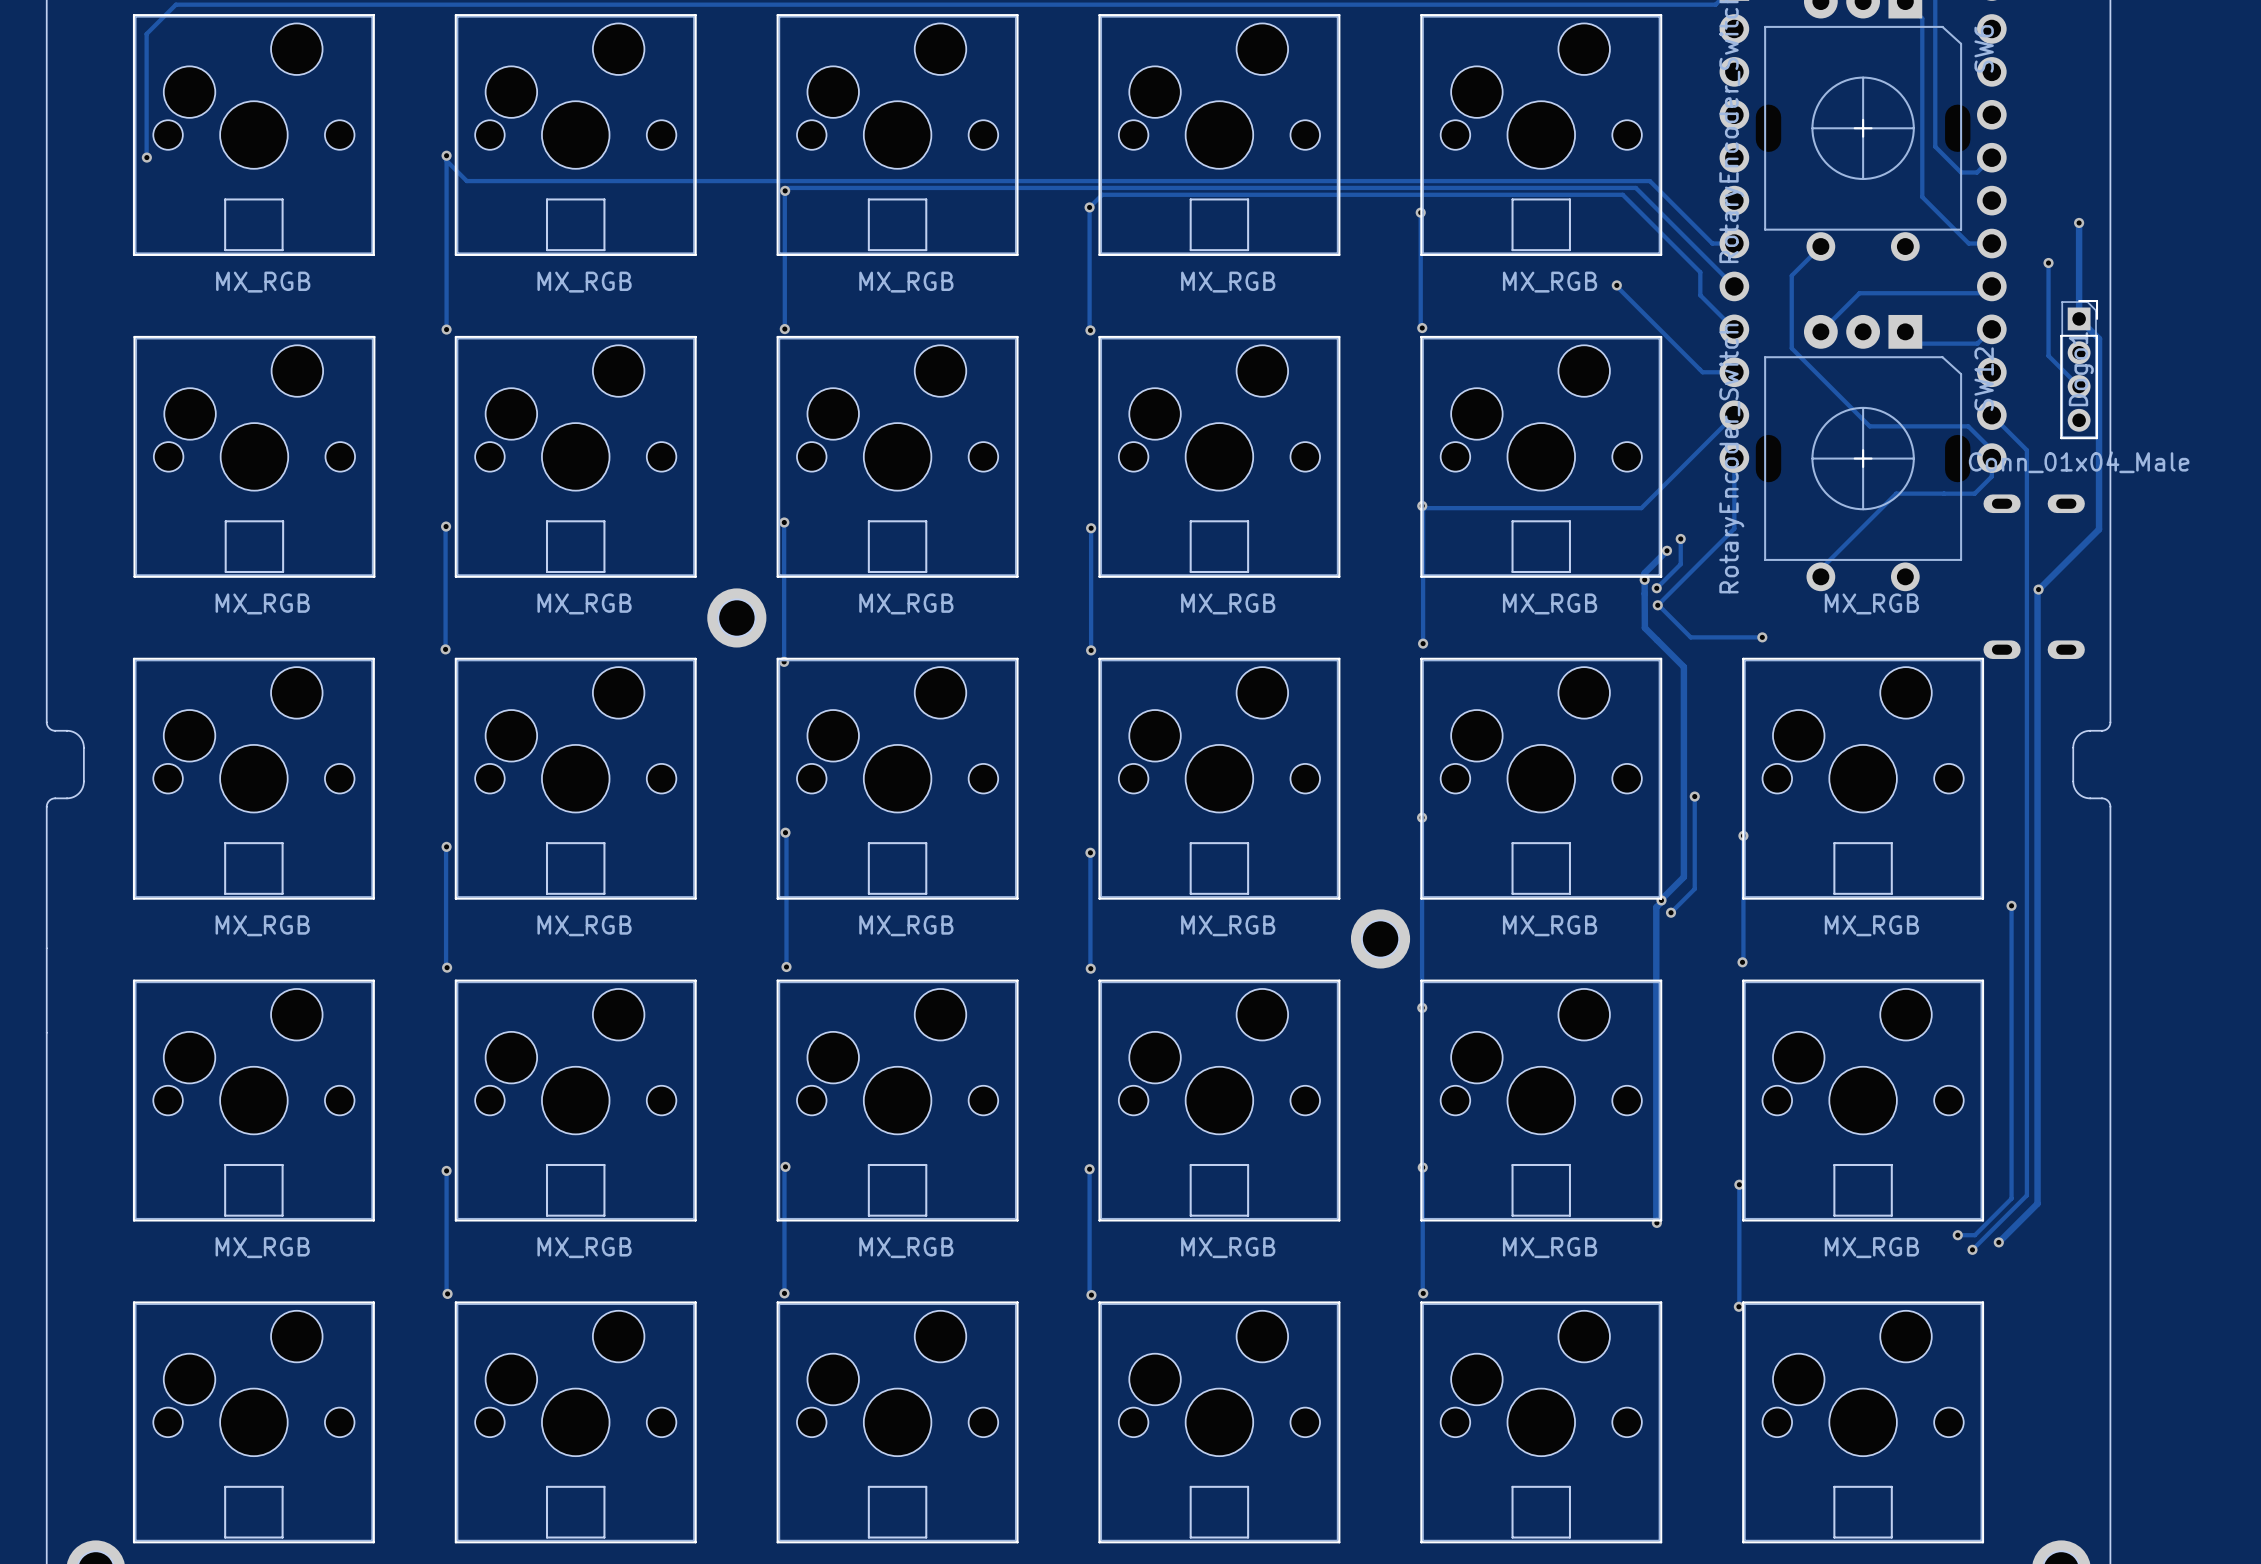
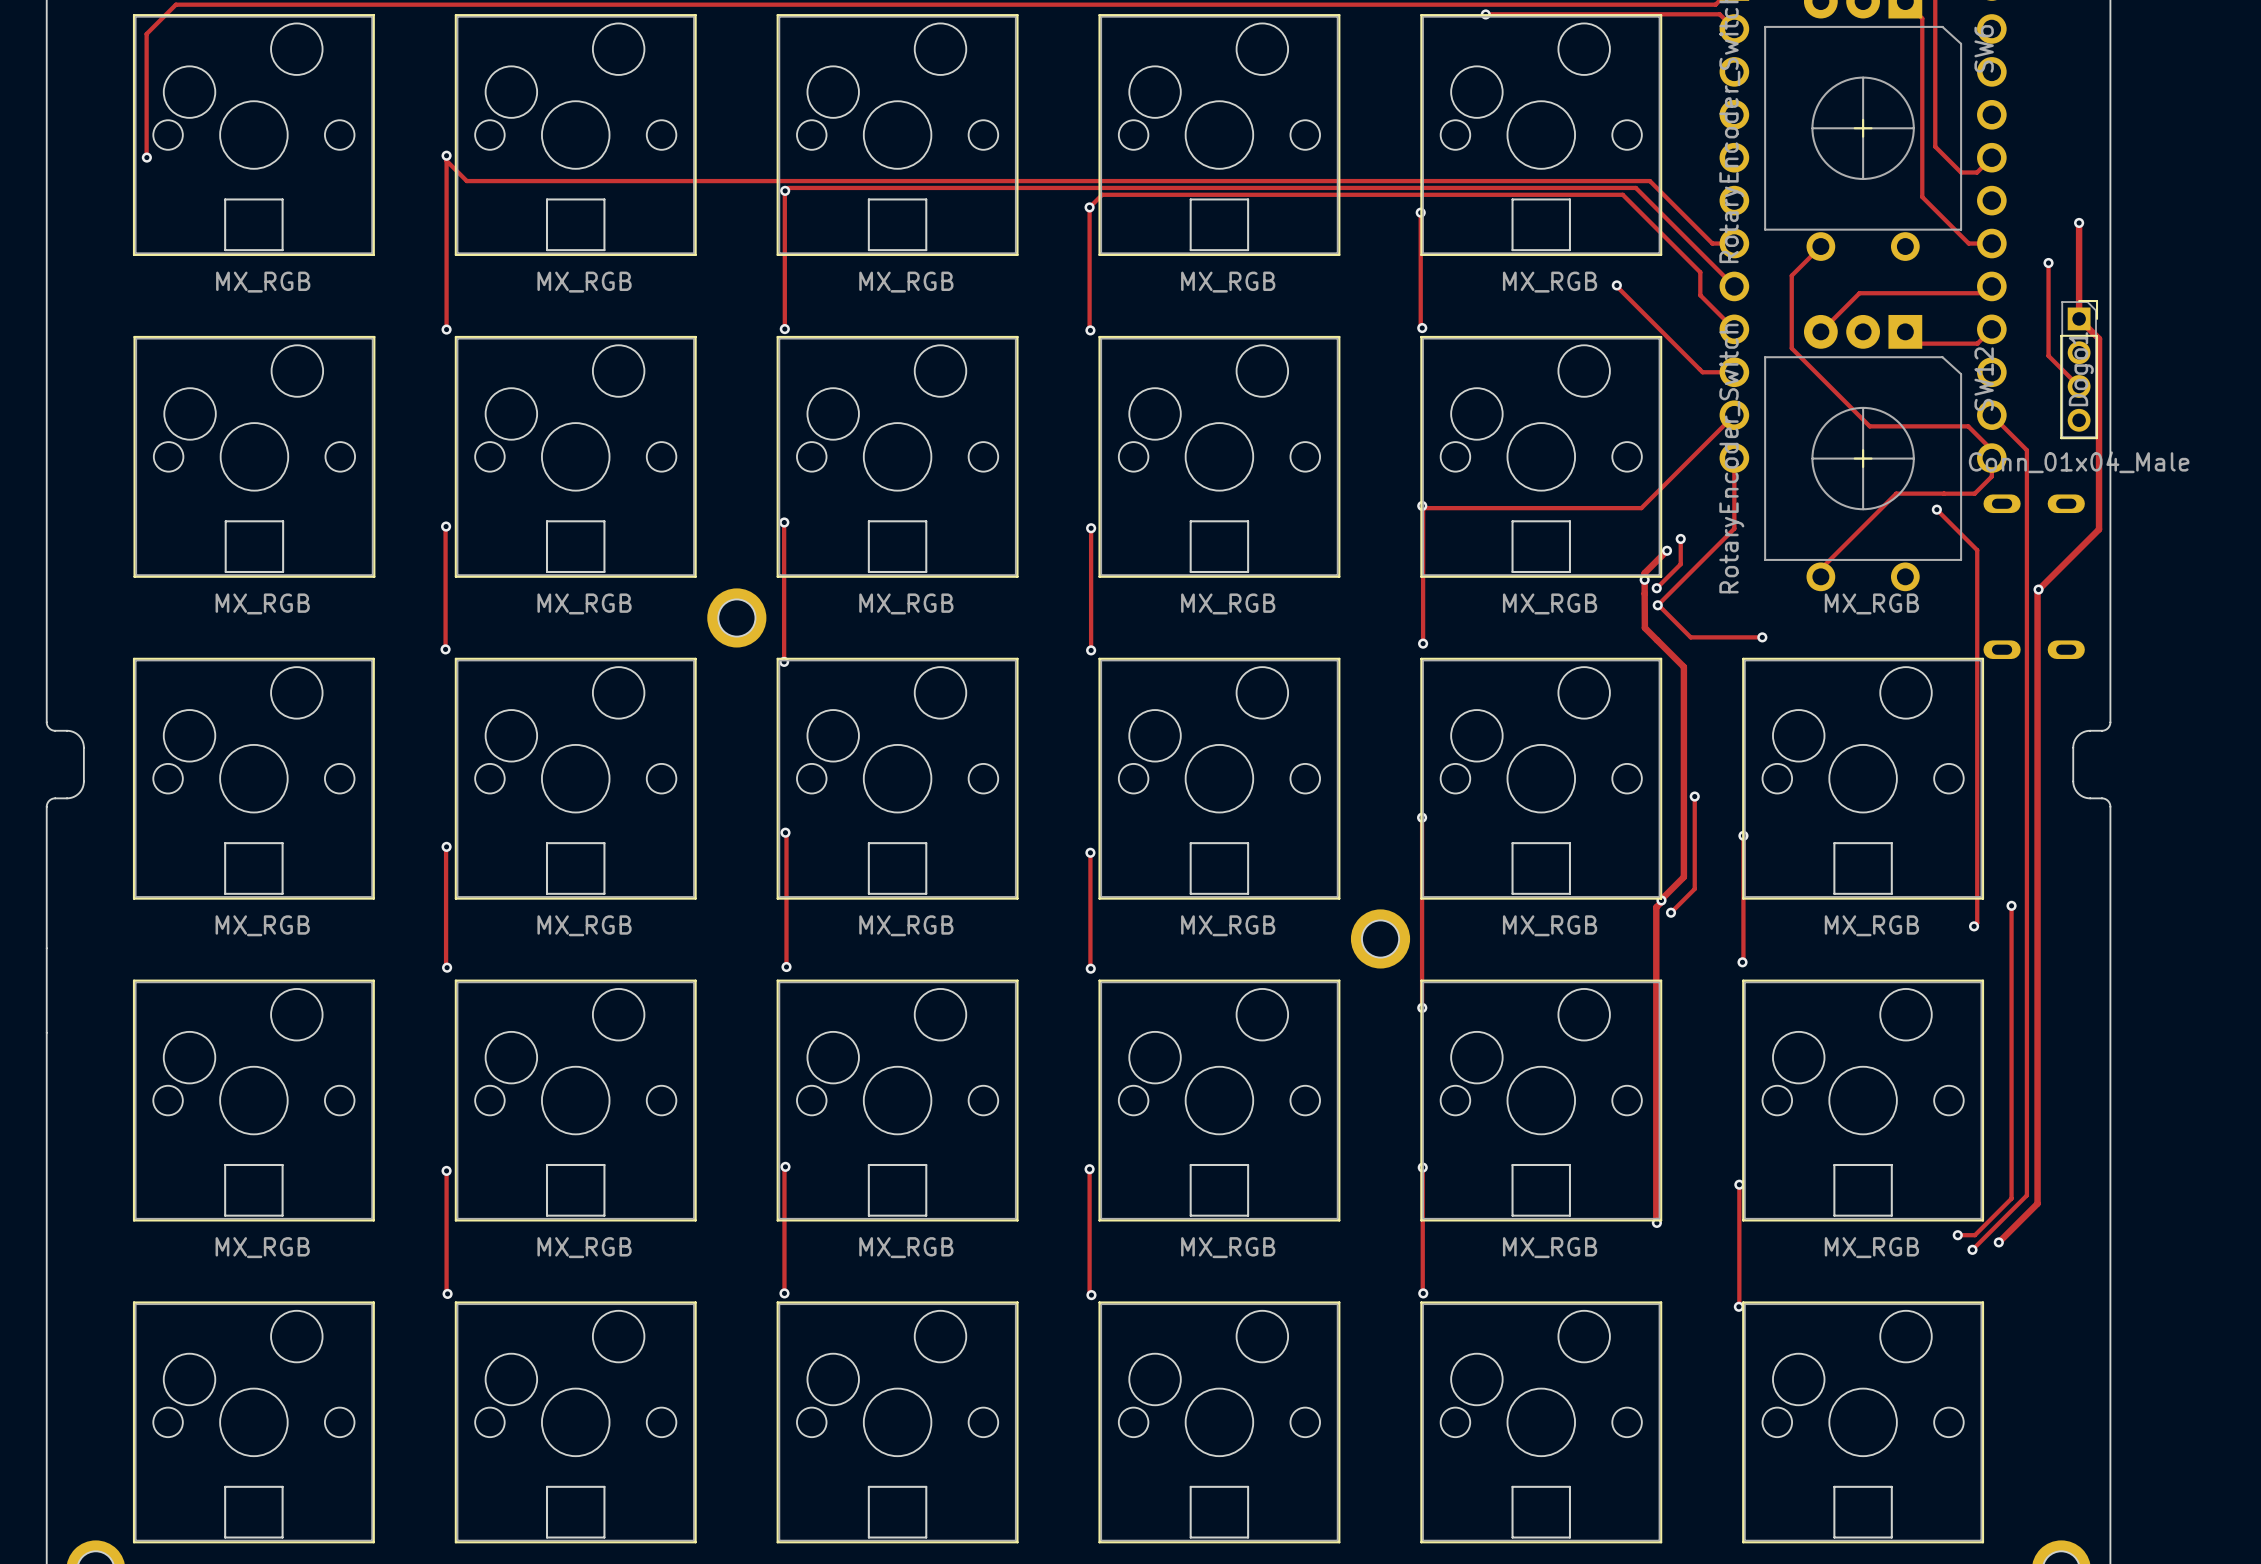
track: none -> (1485, 14) (1719, 14) (1734, 28)
via: none -> (1485, 14)
track: none -> (1936, 509) (1977, 550) (1977, 923) (1974, 926)
via: none -> (1936, 509)
via: none -> (1974, 926)

